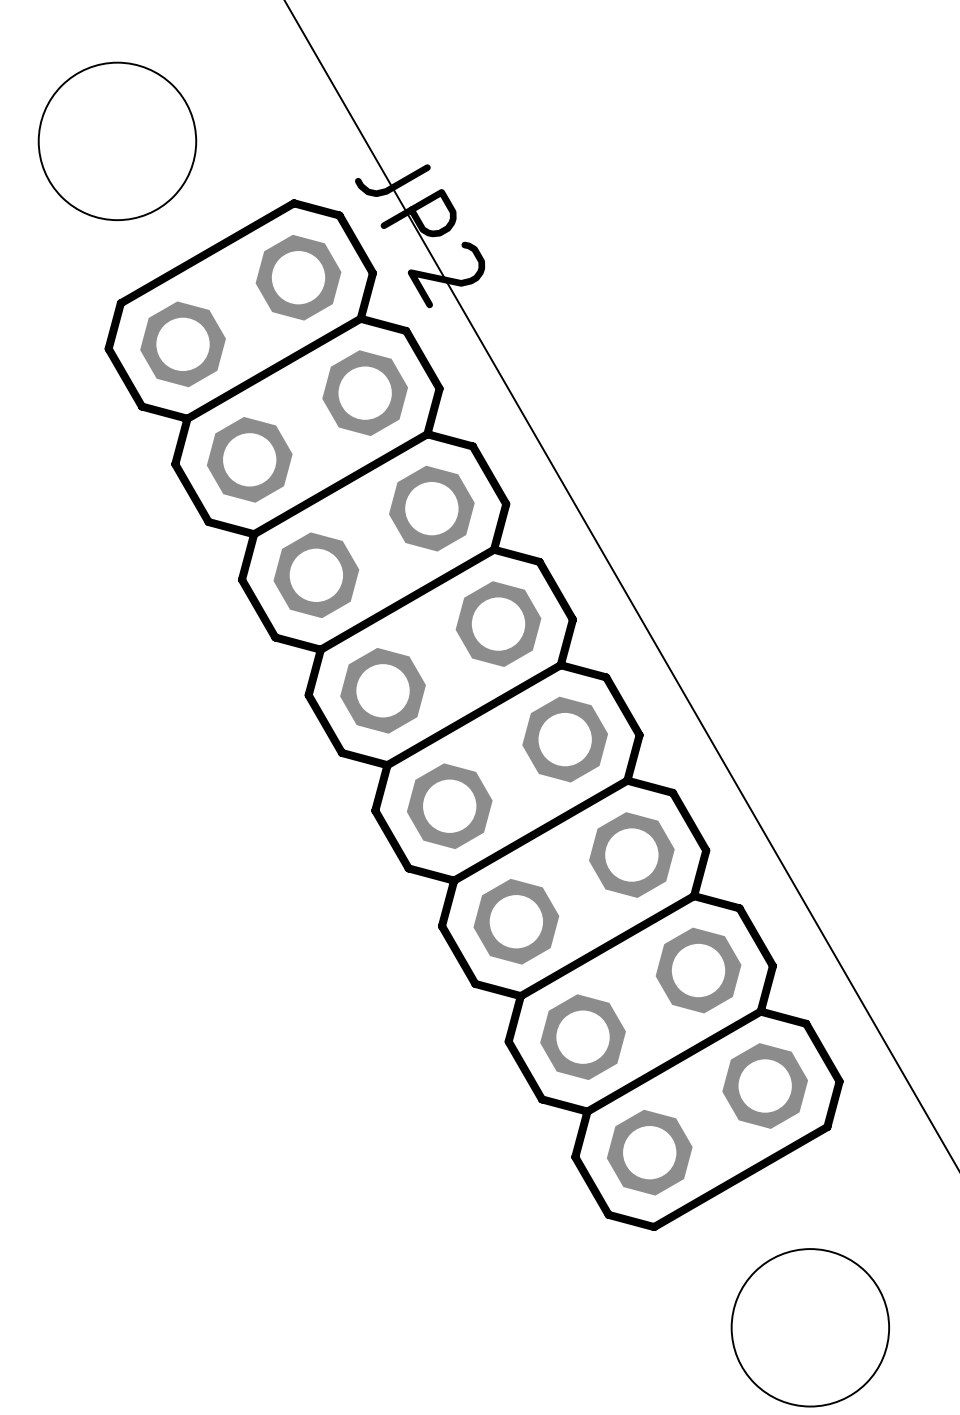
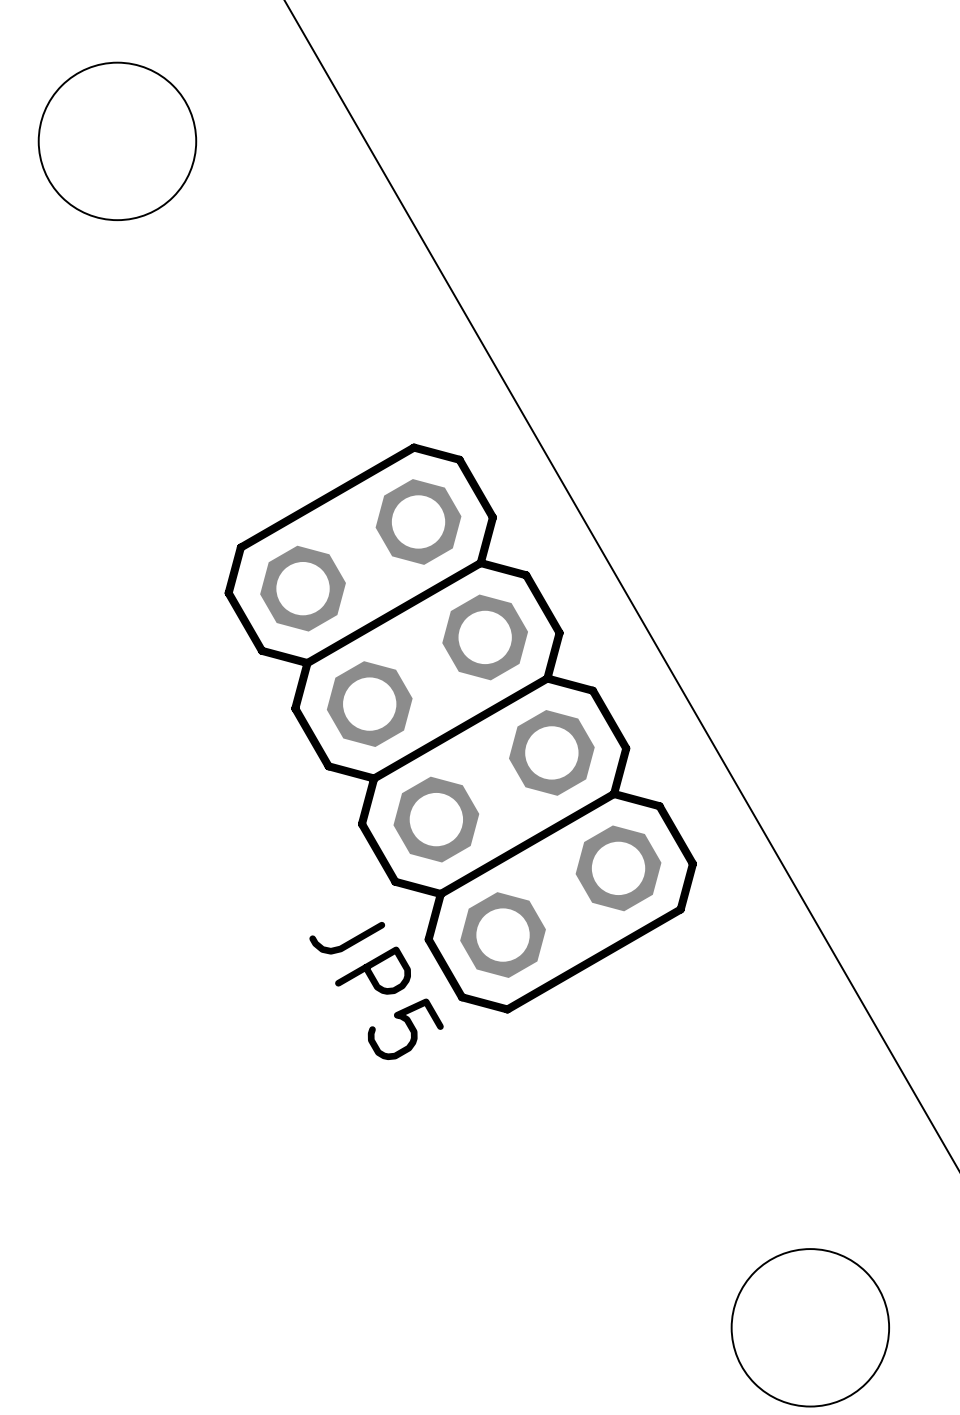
JP2: (474, 715) -> none
JP5: none -> (460, 728)

